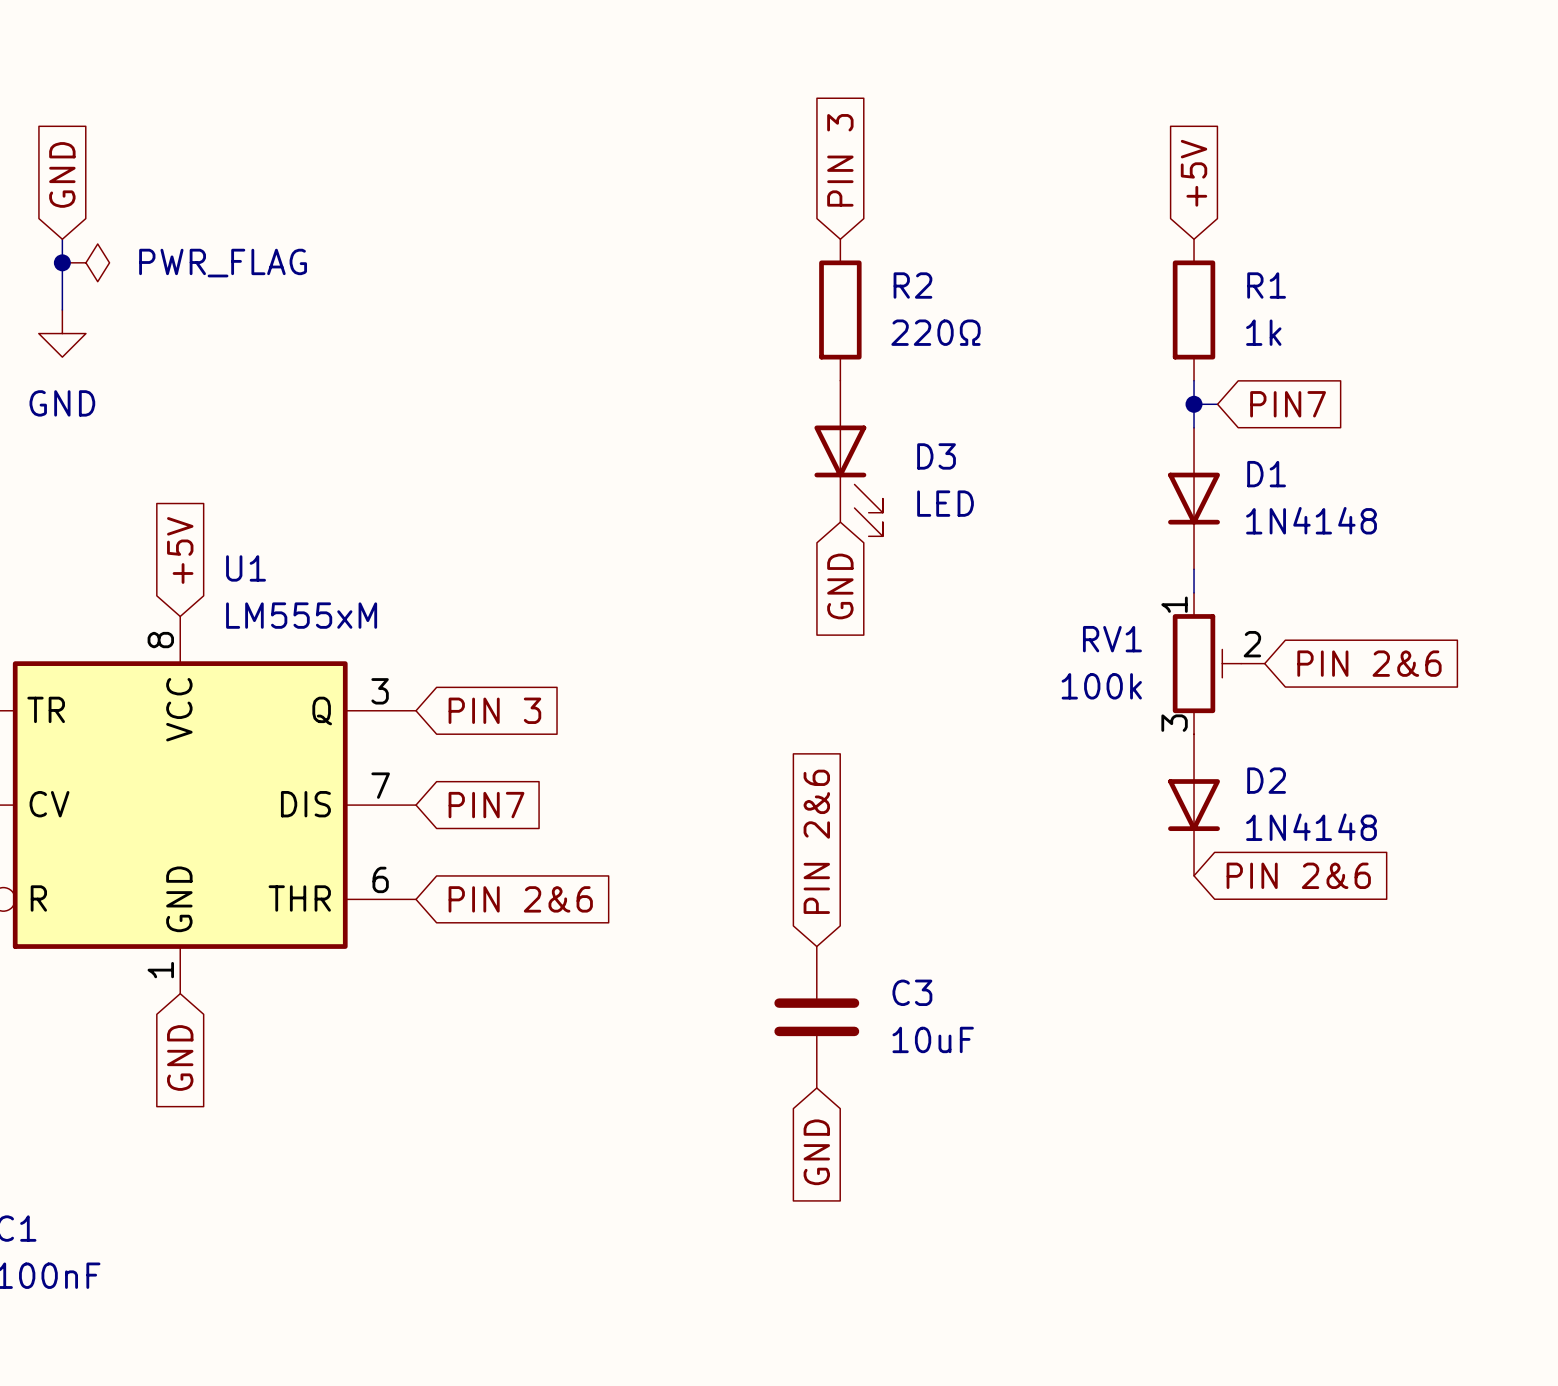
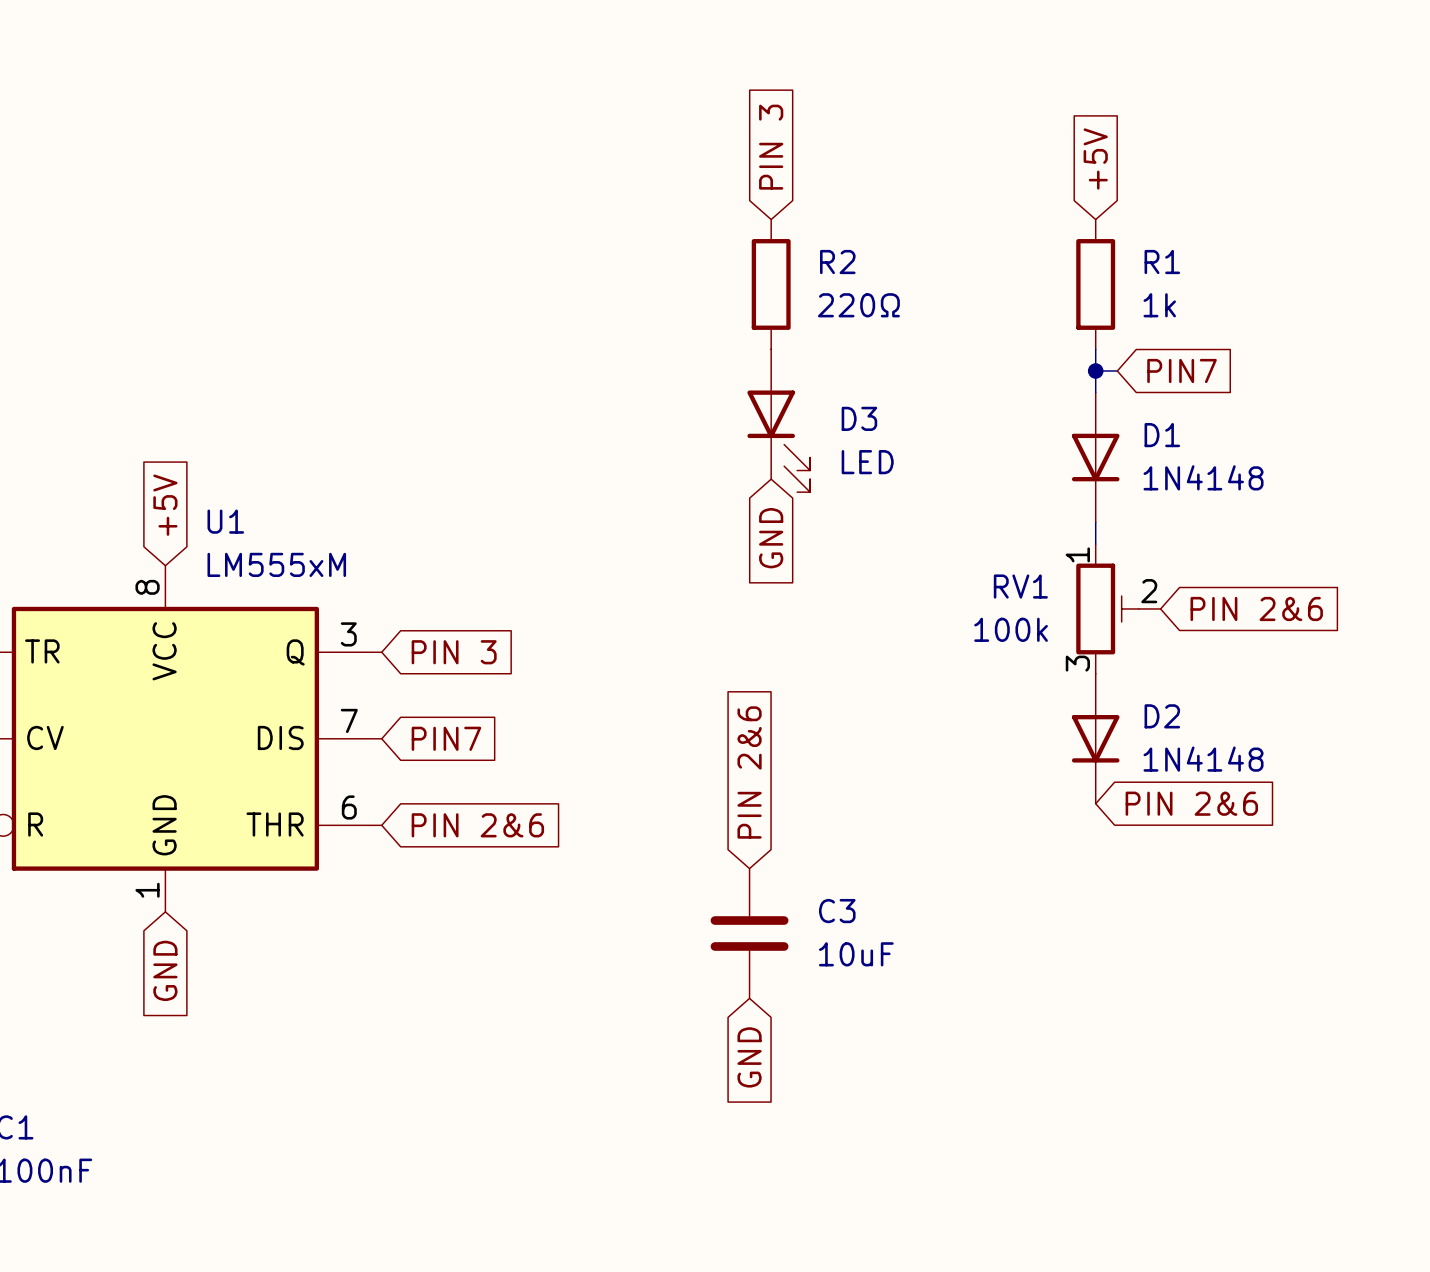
global label: GND (62, 174) -> none
wire: (62, 239) (62, 309) -> none
junction: (62, 262) -> none
power symbol: PWR_FLAG (85, 262) -> none
power symbol: GND (62, 333) -> none

